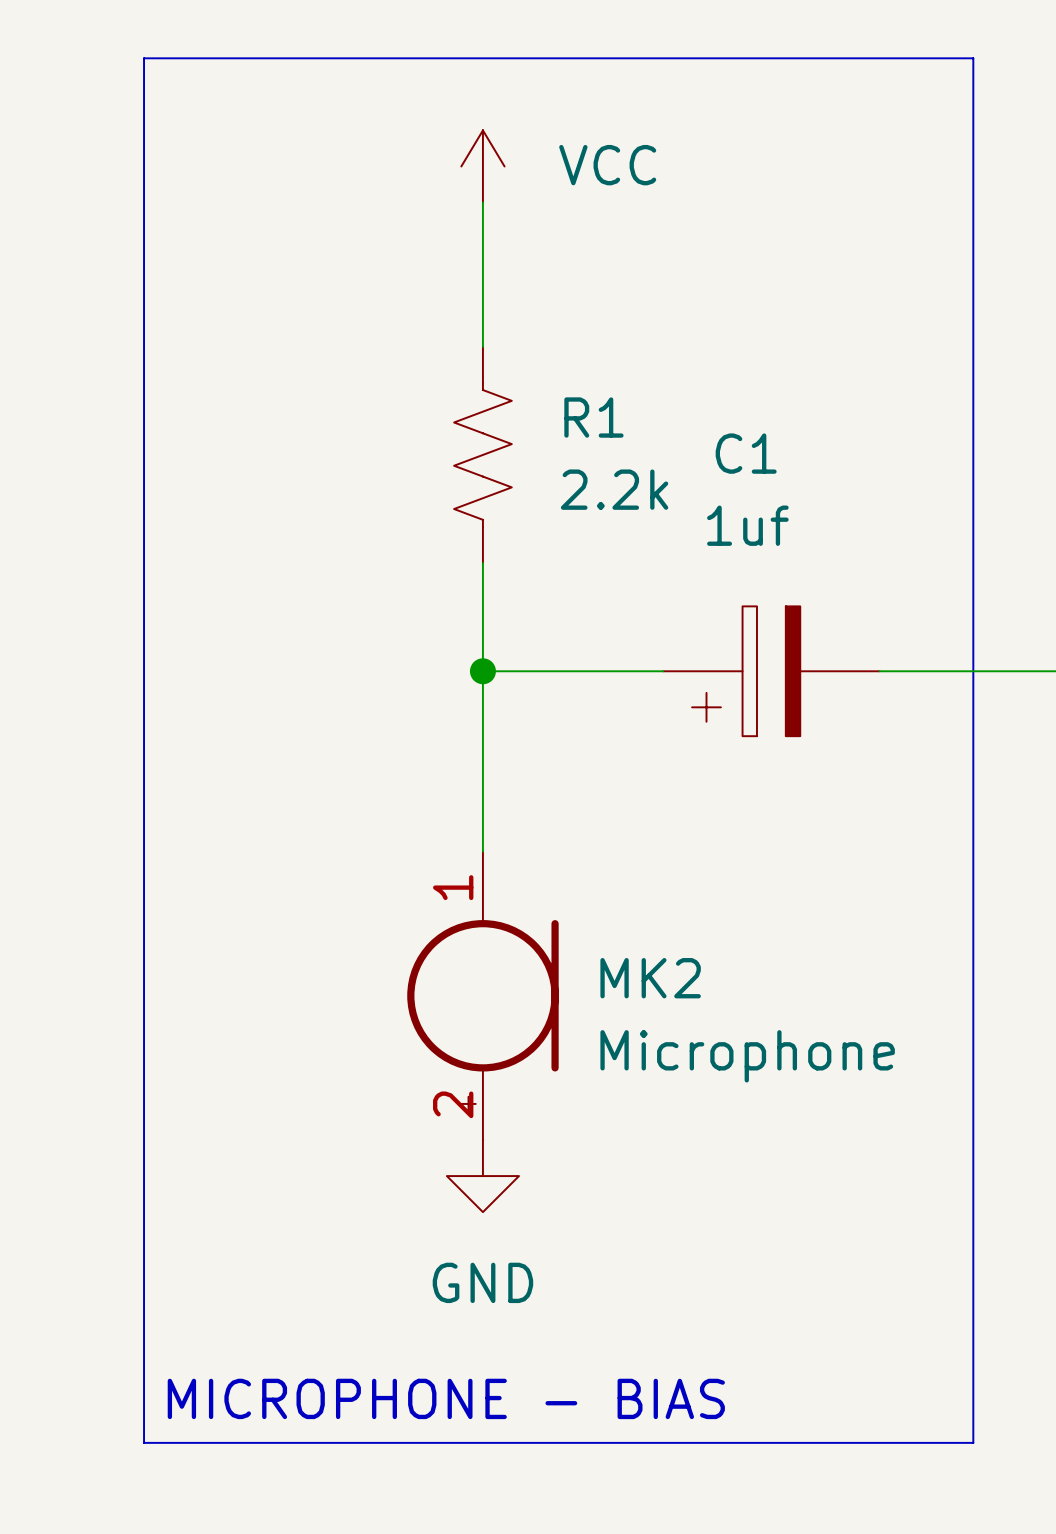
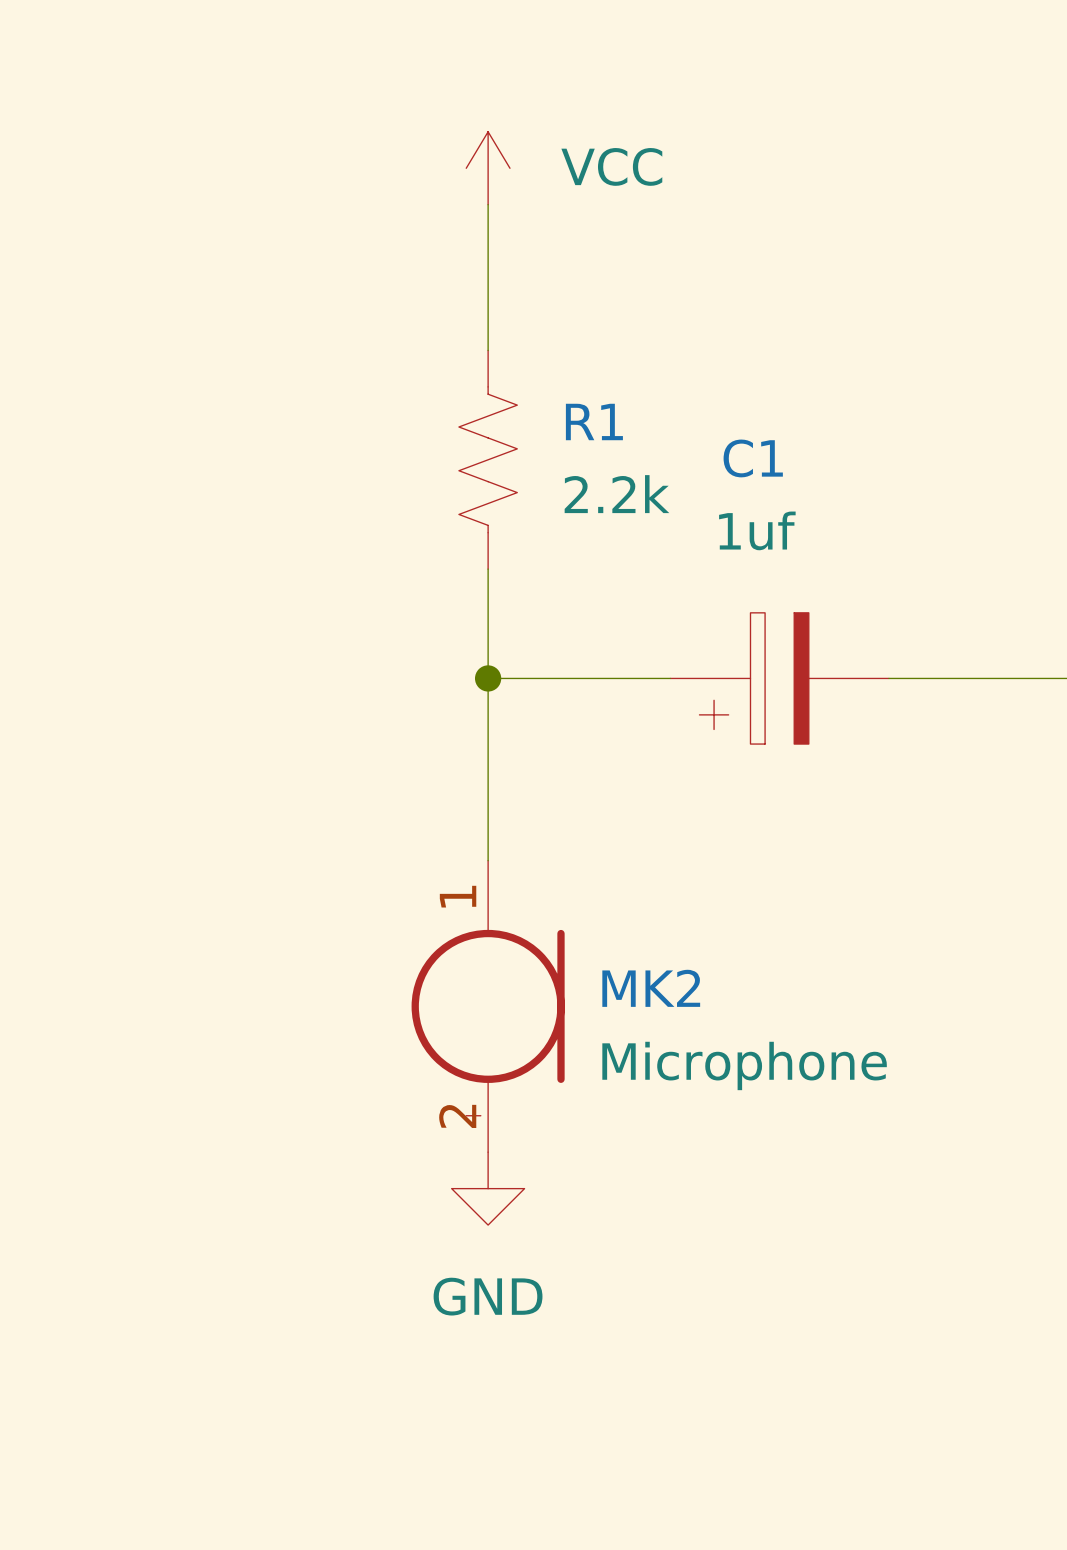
line: (144, 58) (973, 58) (973, 1442) (144, 1442) (144, 58) -> none
text: MICROPHONE - BIAS (446, 1398) -> none

